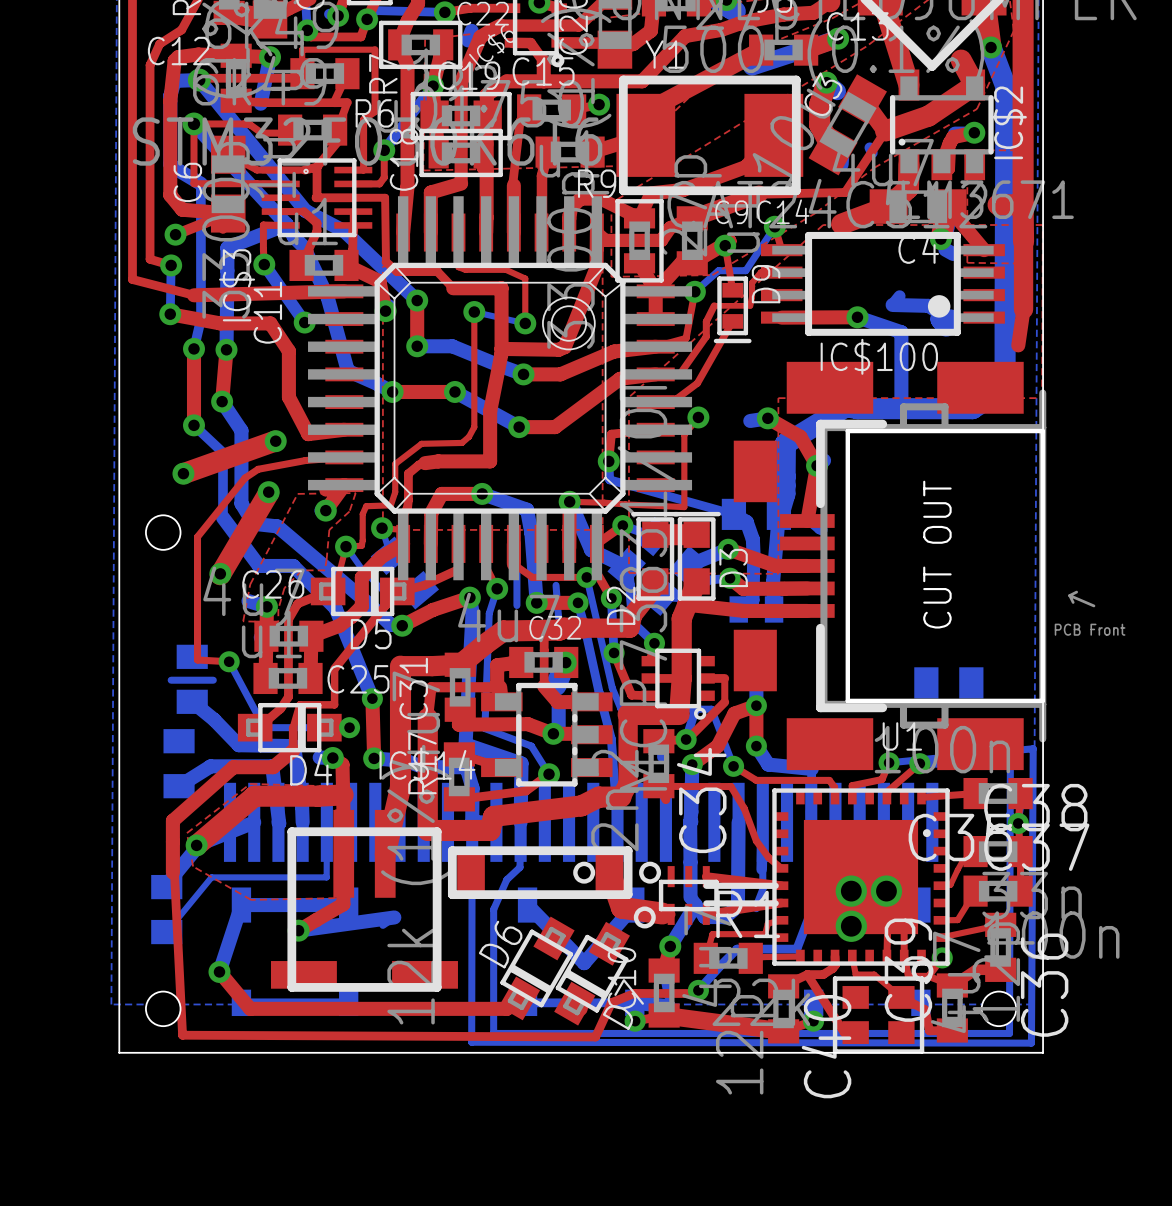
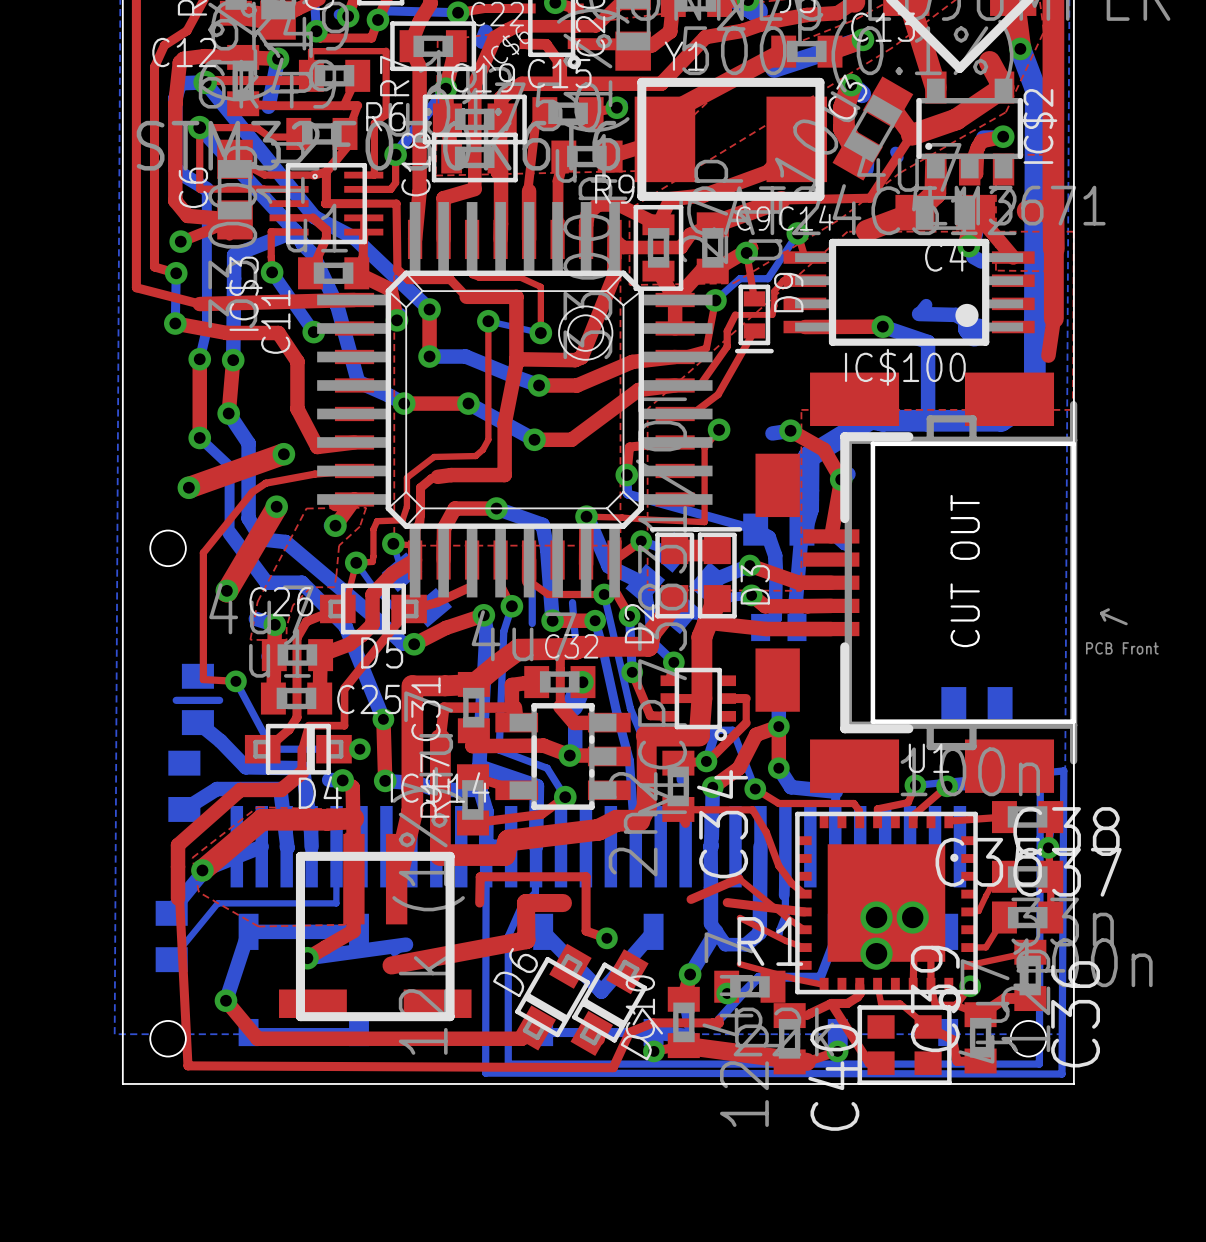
part: (554, 872) -> none
top track: (610, 875) (621, 907) (671, 914) -> none
top track: none -> (479, 903) (480, 876) (586, 876) (586, 931) (606, 938)
top track: none -> (562, 903) (526, 903) (526, 940) (391, 965)
line: (706, 885) (775, 885) -> none
part: (676, 897) -> none
line: (706, 903) (775, 903) -> none
top track: (781, 903) (706, 914) -> (804, 929) (738, 878) (691, 899)
via: none -> (606, 938)
top track: (781, 920) (767, 923) (765, 934) (712, 934) (705, 958) -> (804, 947) (786, 941) (739, 917)
top track: (800, 956) (750, 958) -> (824, 984) (739, 964)
via position: (698, 990) -> (727, 993)
C40 position: (783, 1008) -> (789, 1038)

